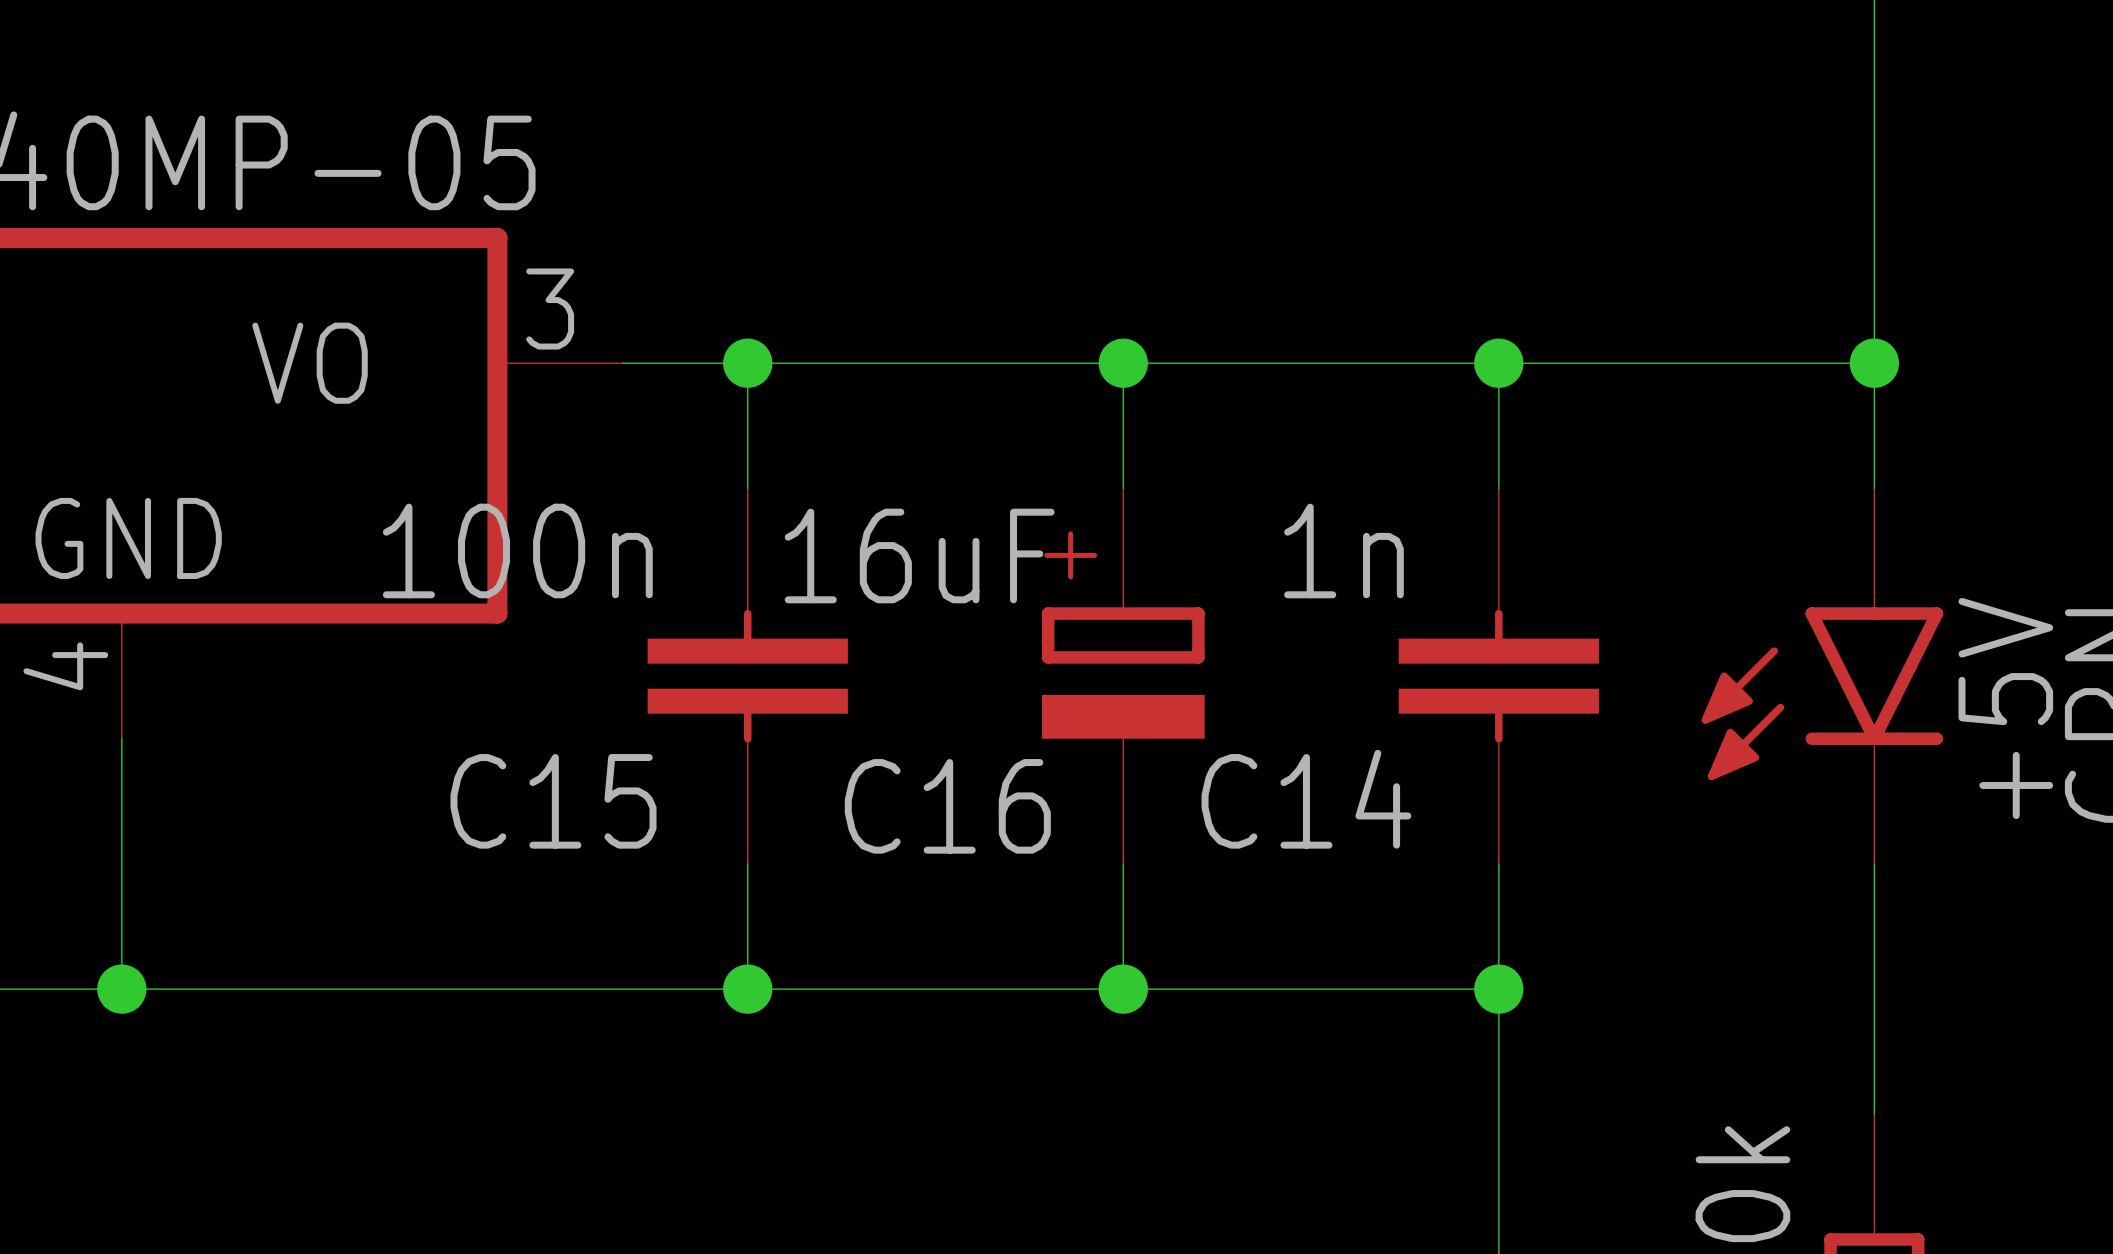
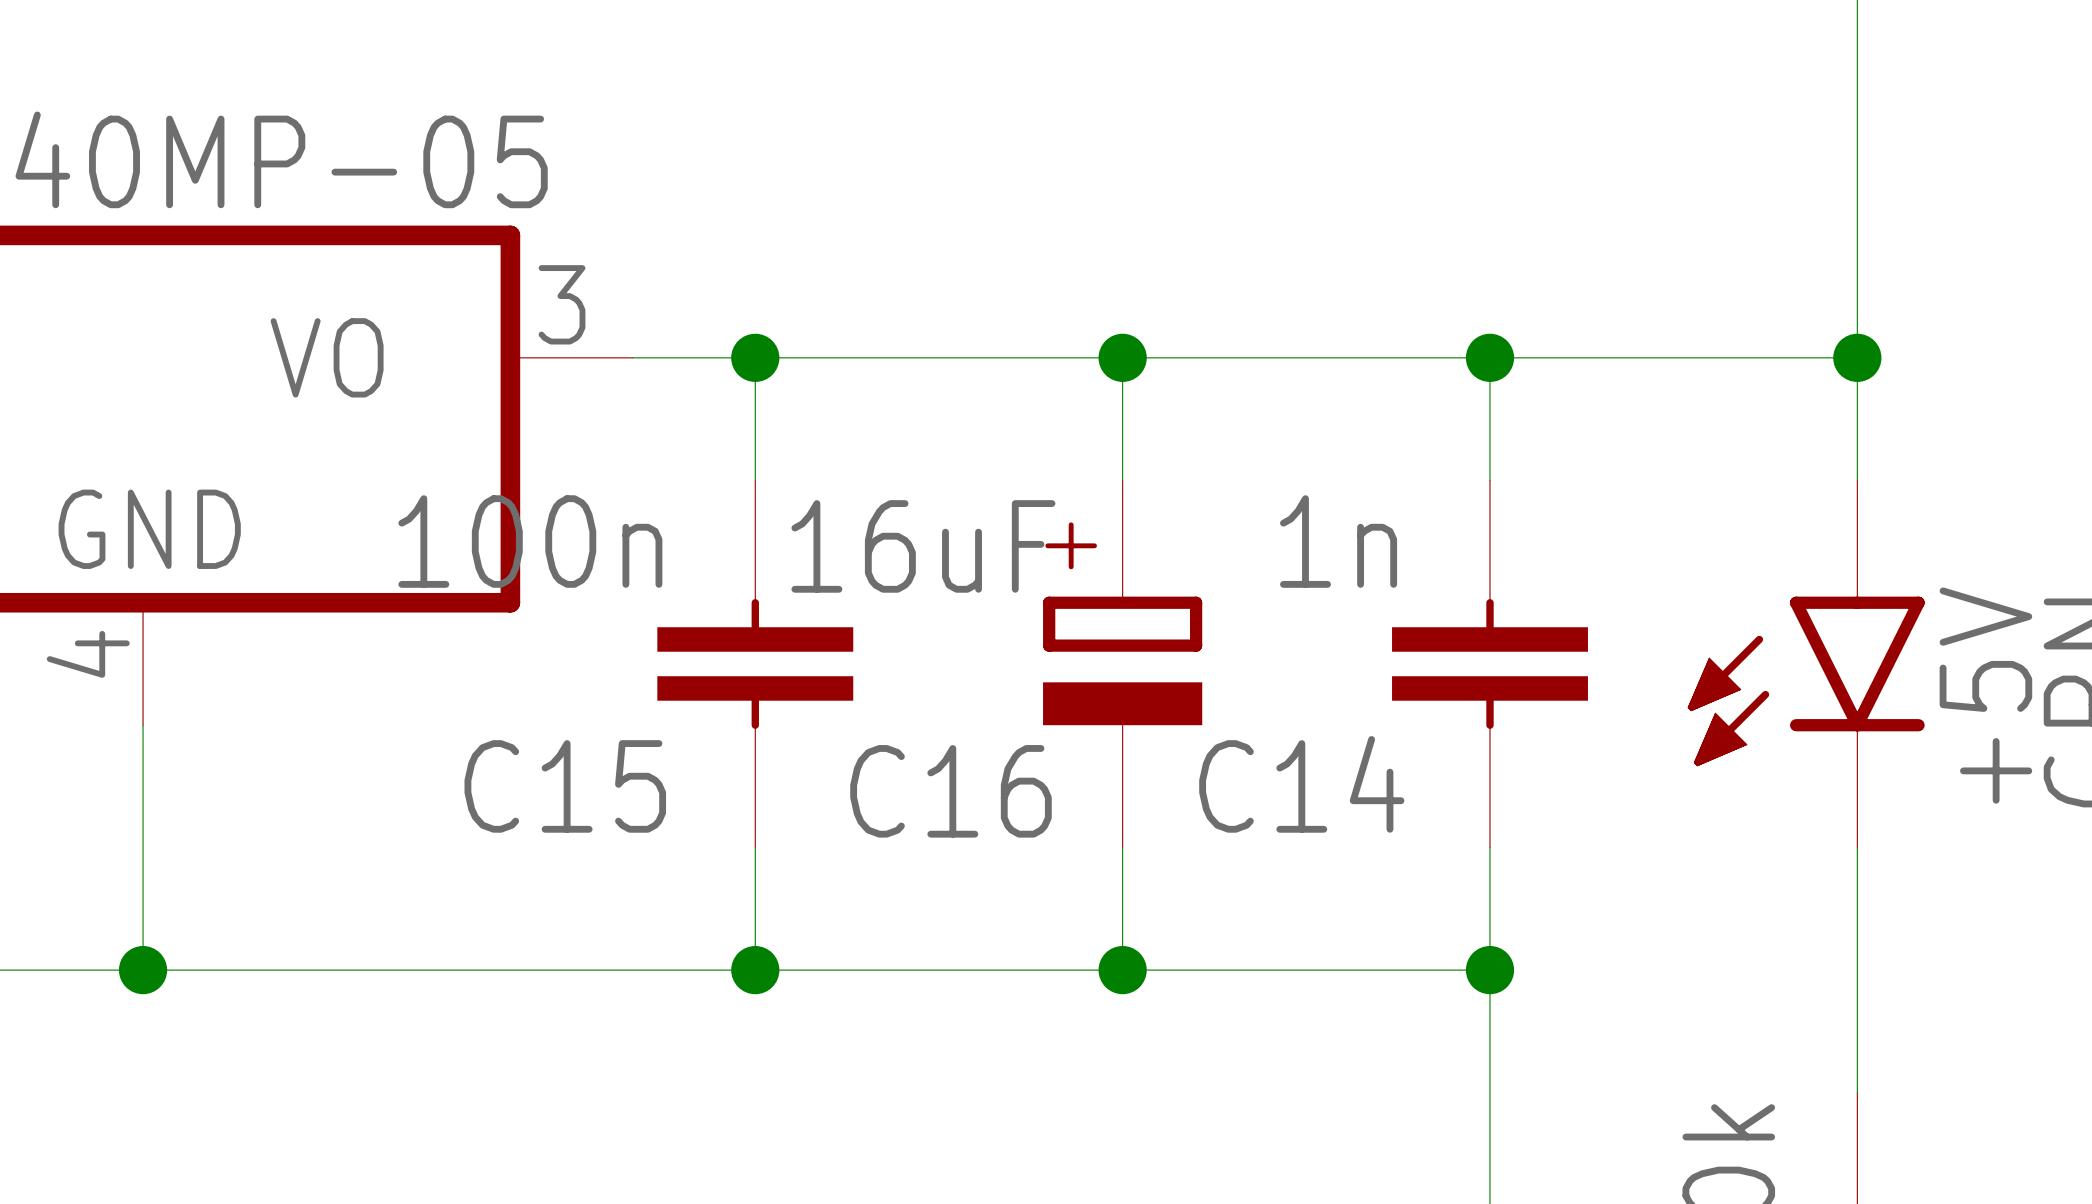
+5V symbol: [1701, 488, 1944, 864] -> [1687, 480, 1925, 848]

